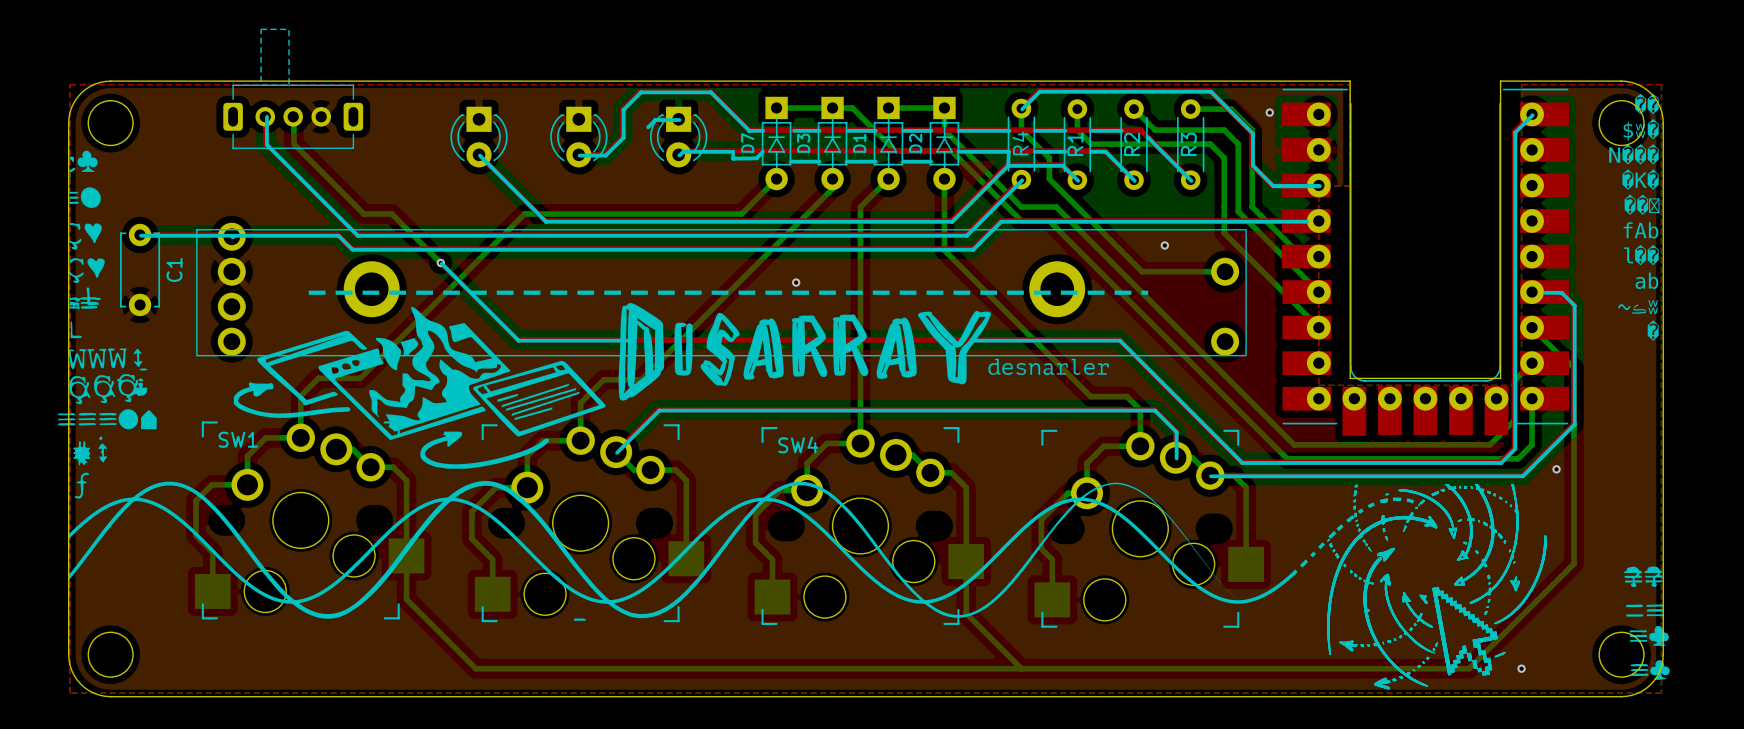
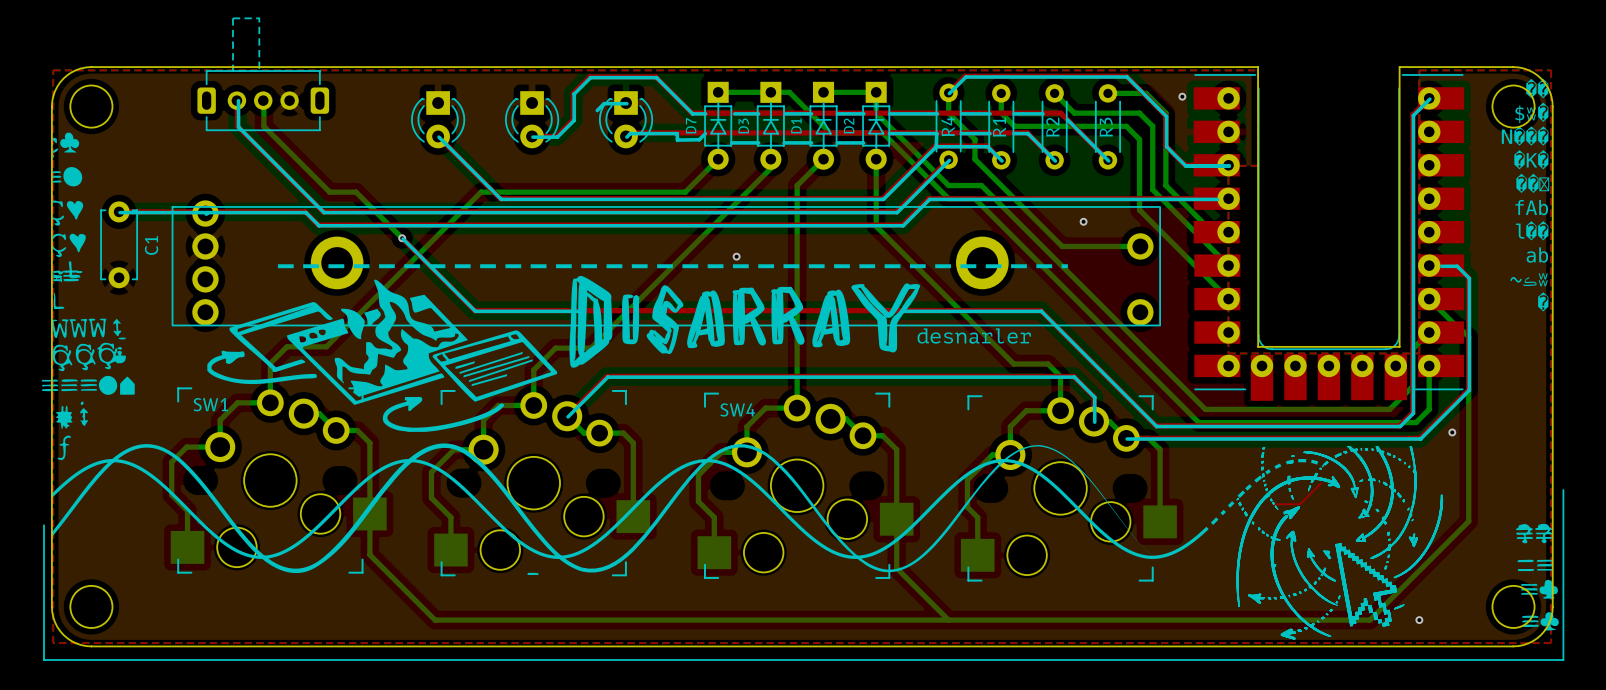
top track: none -> (1321, 483) (1300, 504) (1272, 504)
line: none -> (1563, 489) (1563, 660) (44, 660) (44, 525)

